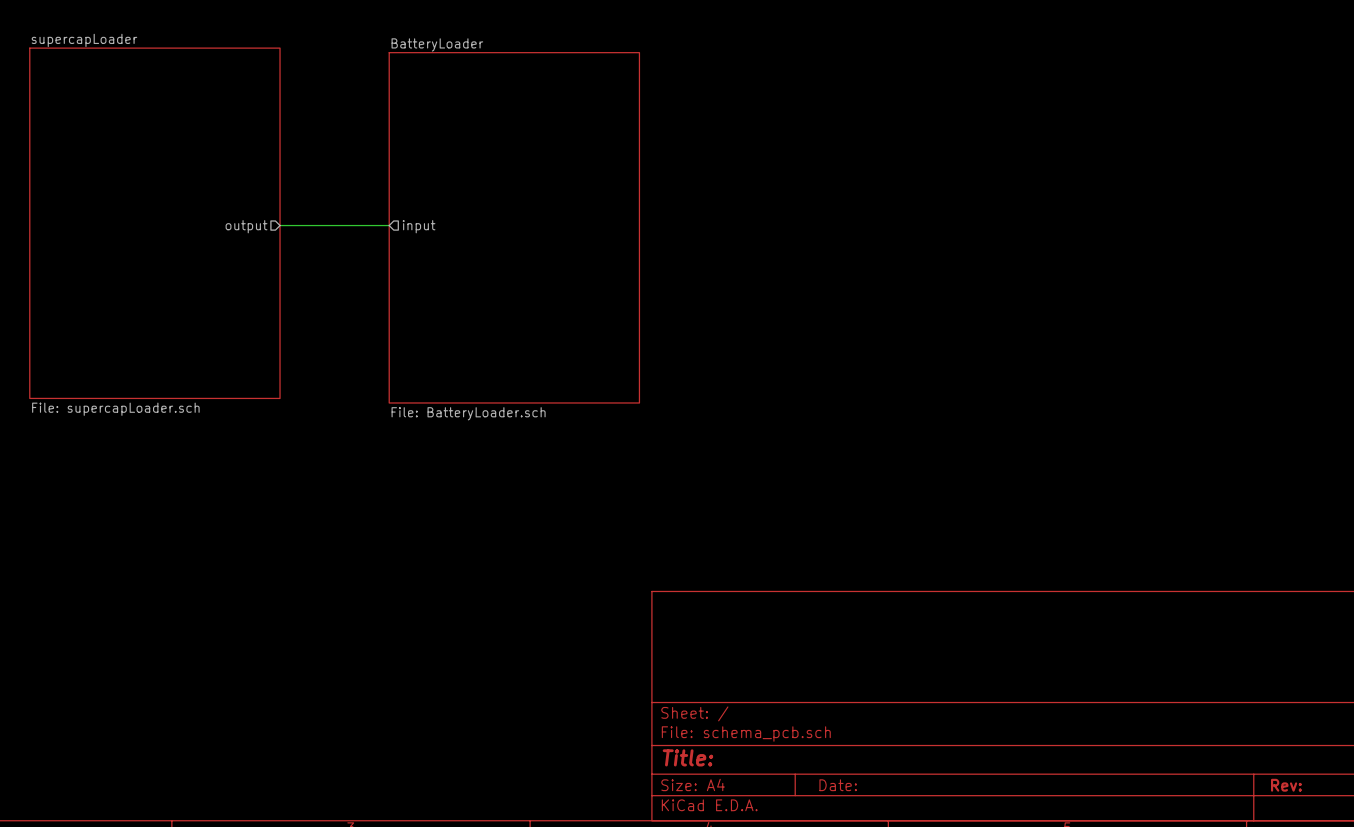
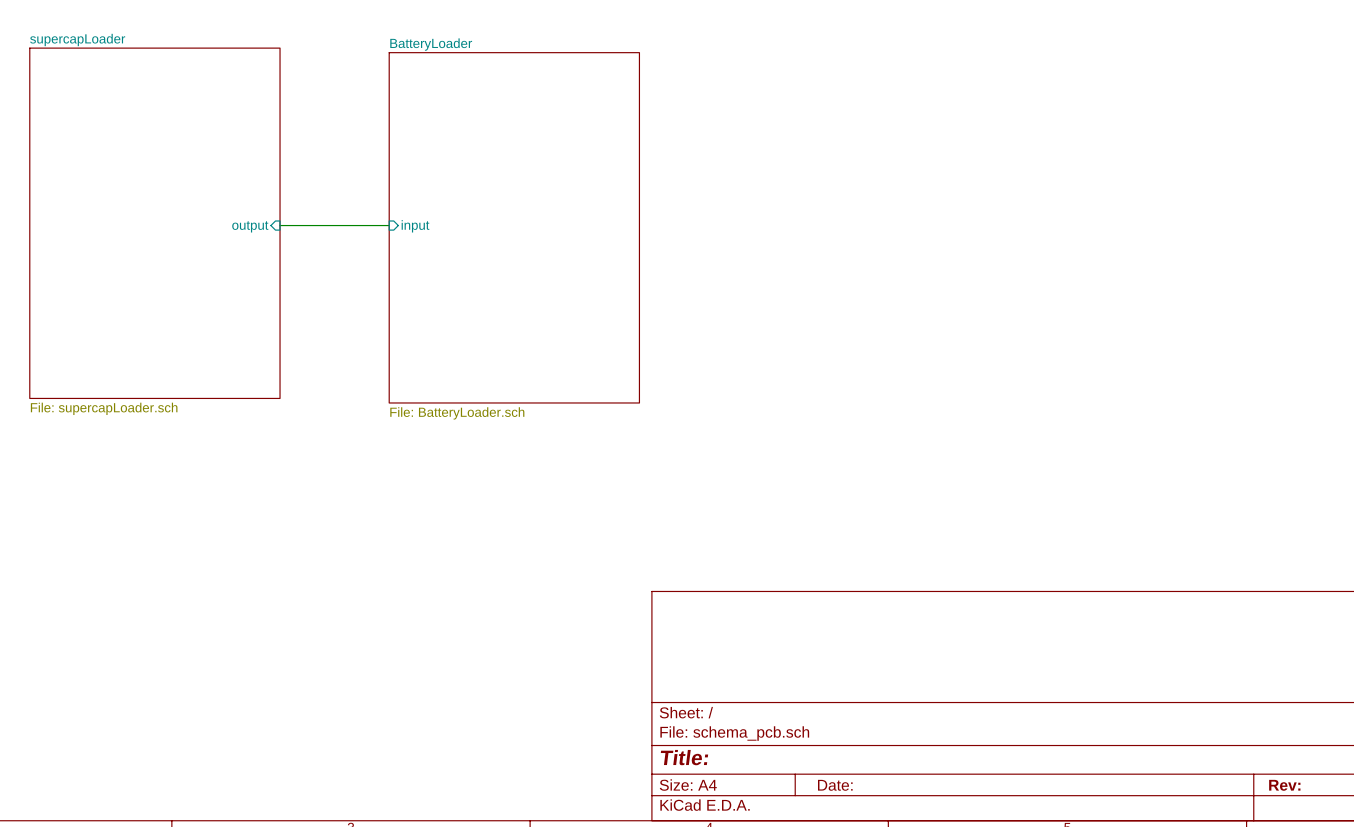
hierarchical label: output (246, 226) -> none
sheet pin: none -> output (250, 226)
hierarchical label: input (419, 226) -> none
sheet pin: none -> input (415, 226)

